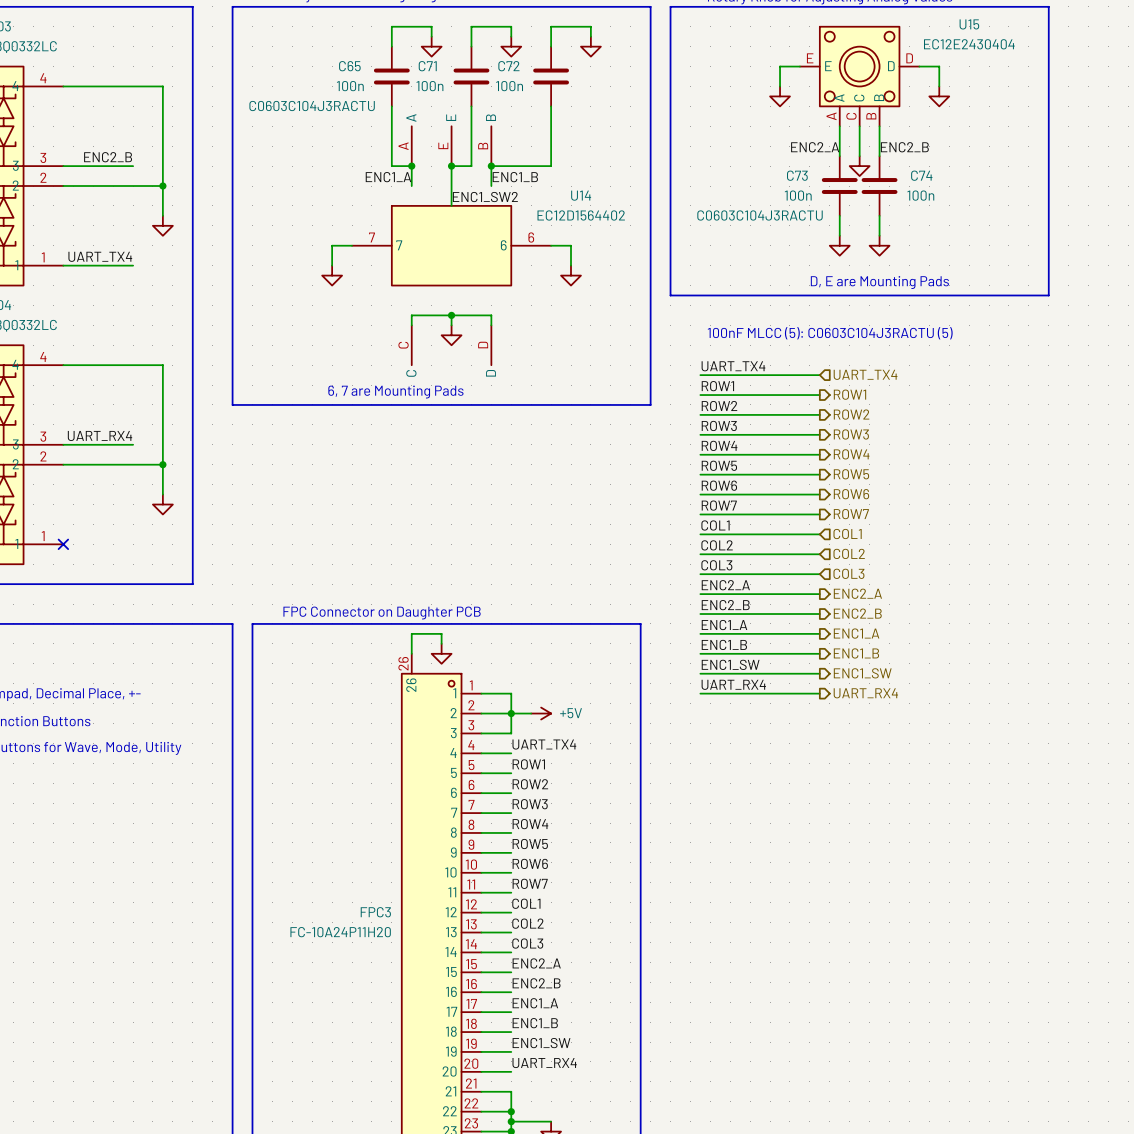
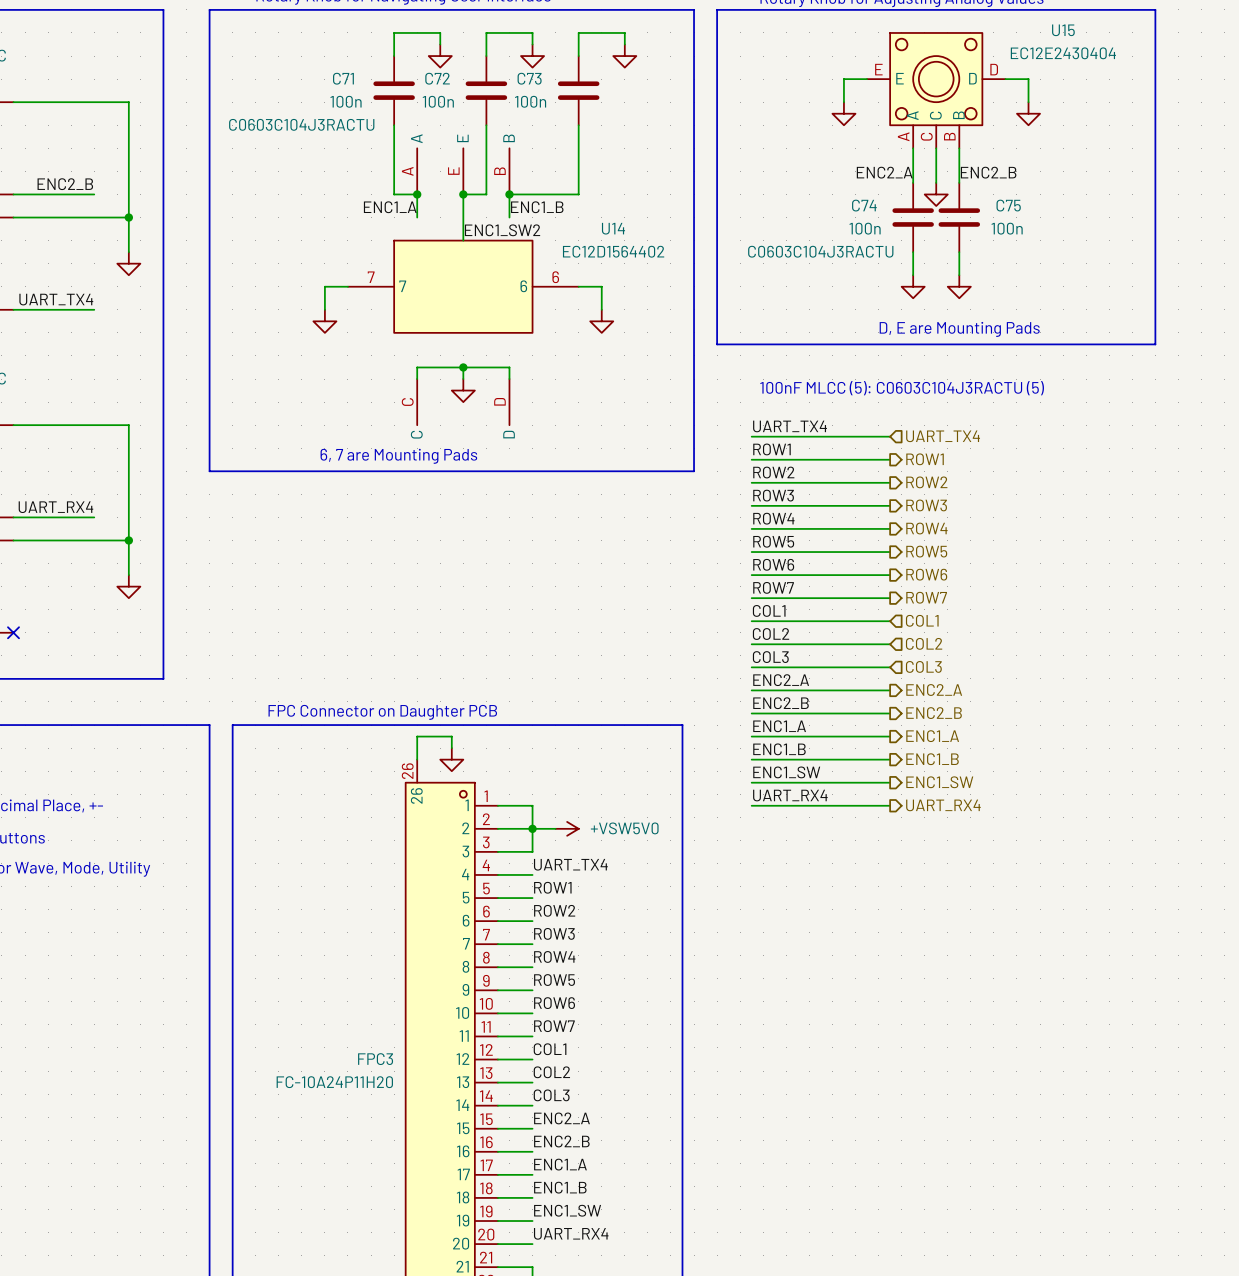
C65 name: C65 (349, 66) -> C71 (343, 78)
C71 name: C71 (427, 66) -> C72 (437, 78)
C72 name: C72 (508, 66) -> C73 (529, 78)
C73 name: C73 (797, 175) -> C74 (864, 205)
C74 name: C74 (921, 175) -> C75 (1008, 205)
power symbol: +5V (541, 713) -> +VSW5V0 (567, 828)

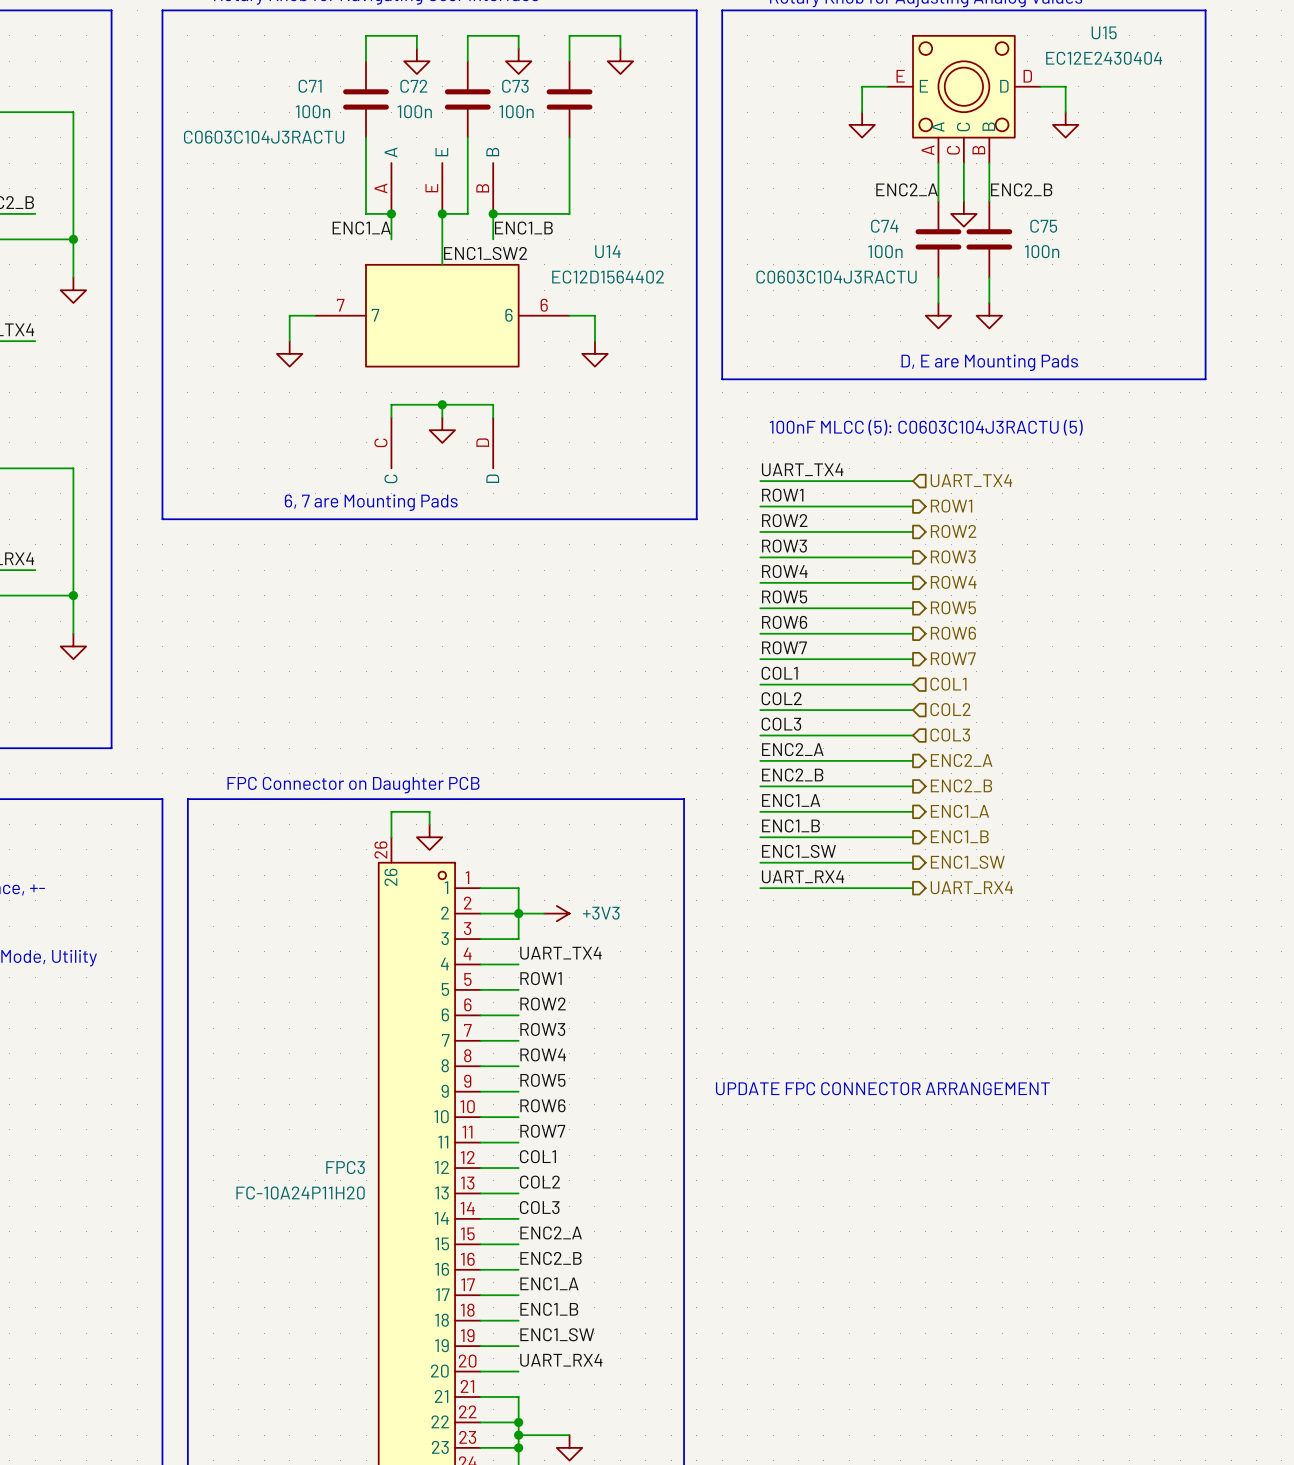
power symbol: +VSW5V0 (567, 828) -> +3V3 (556, 913)
text: none -> UPDATE FPC CONNECTOR ARRANGEMENT (882, 1088)

